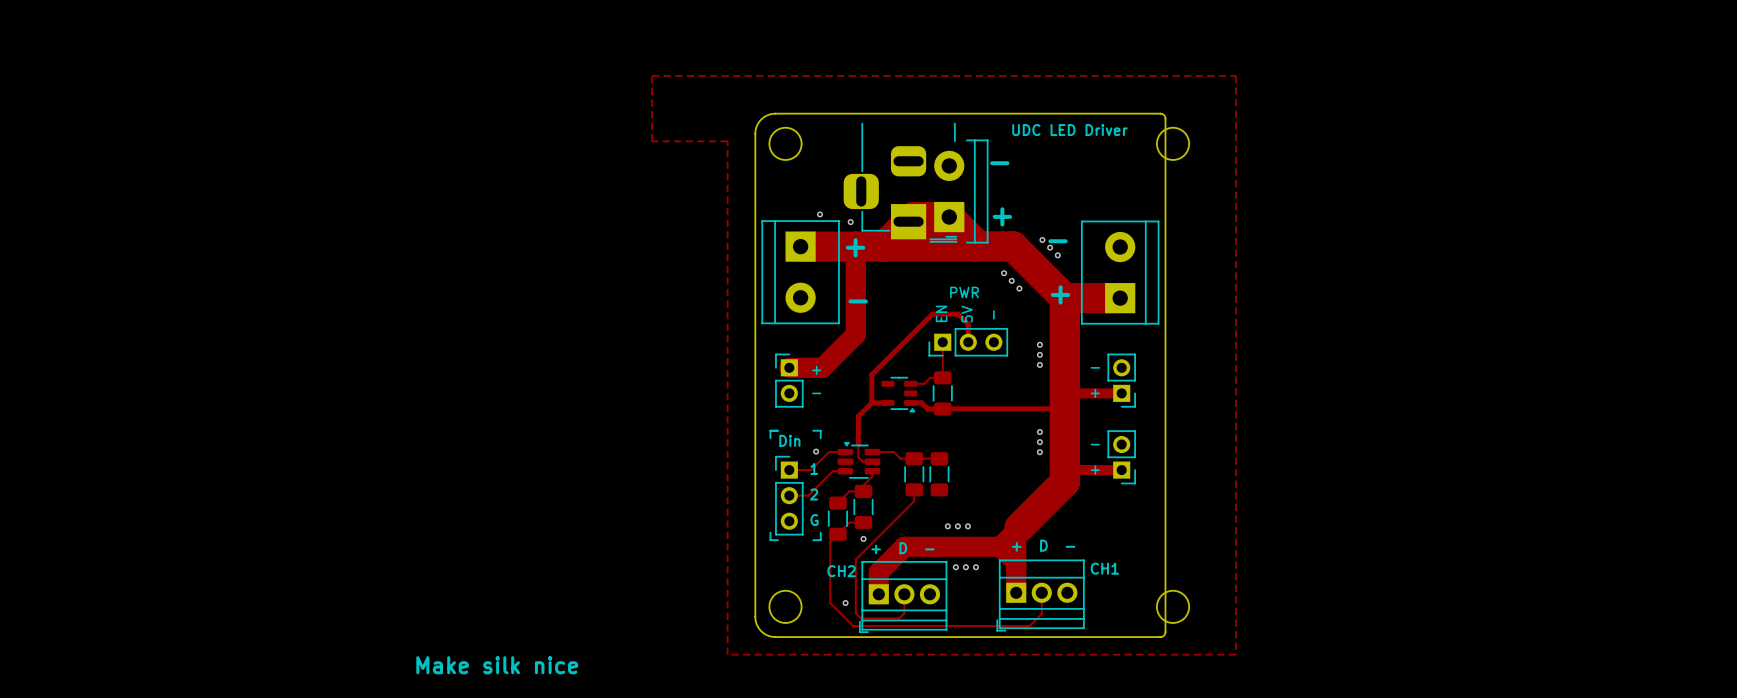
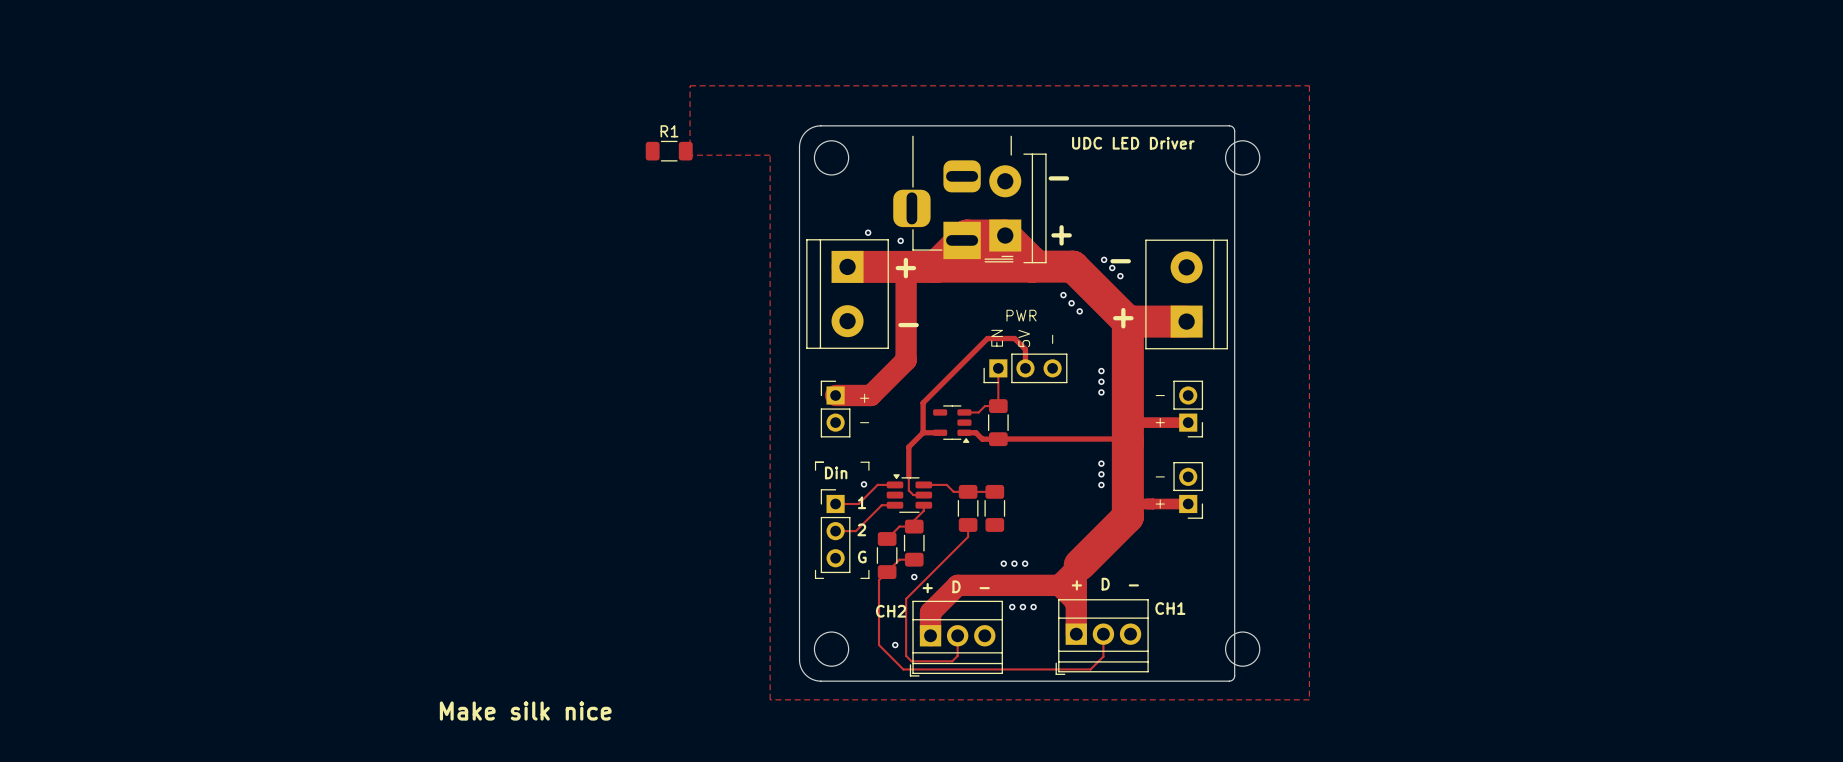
R1: none -> (669, 151)

